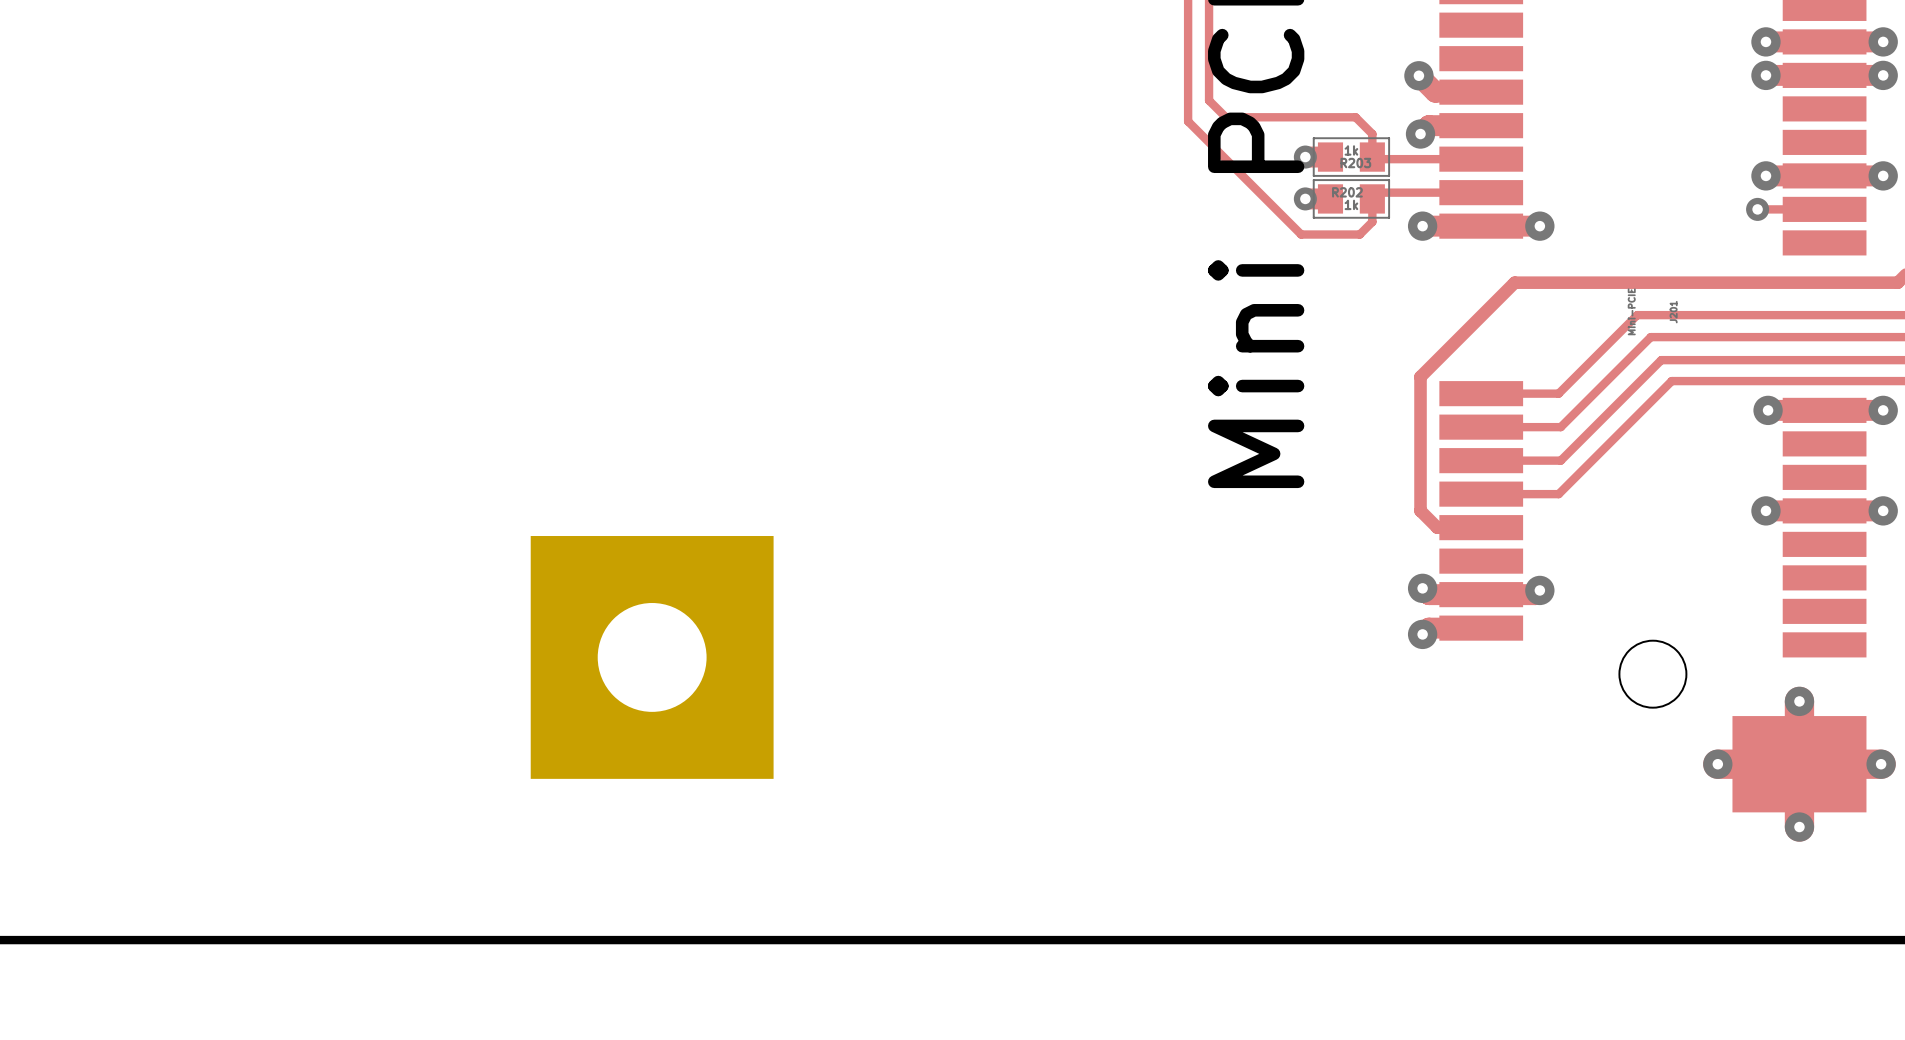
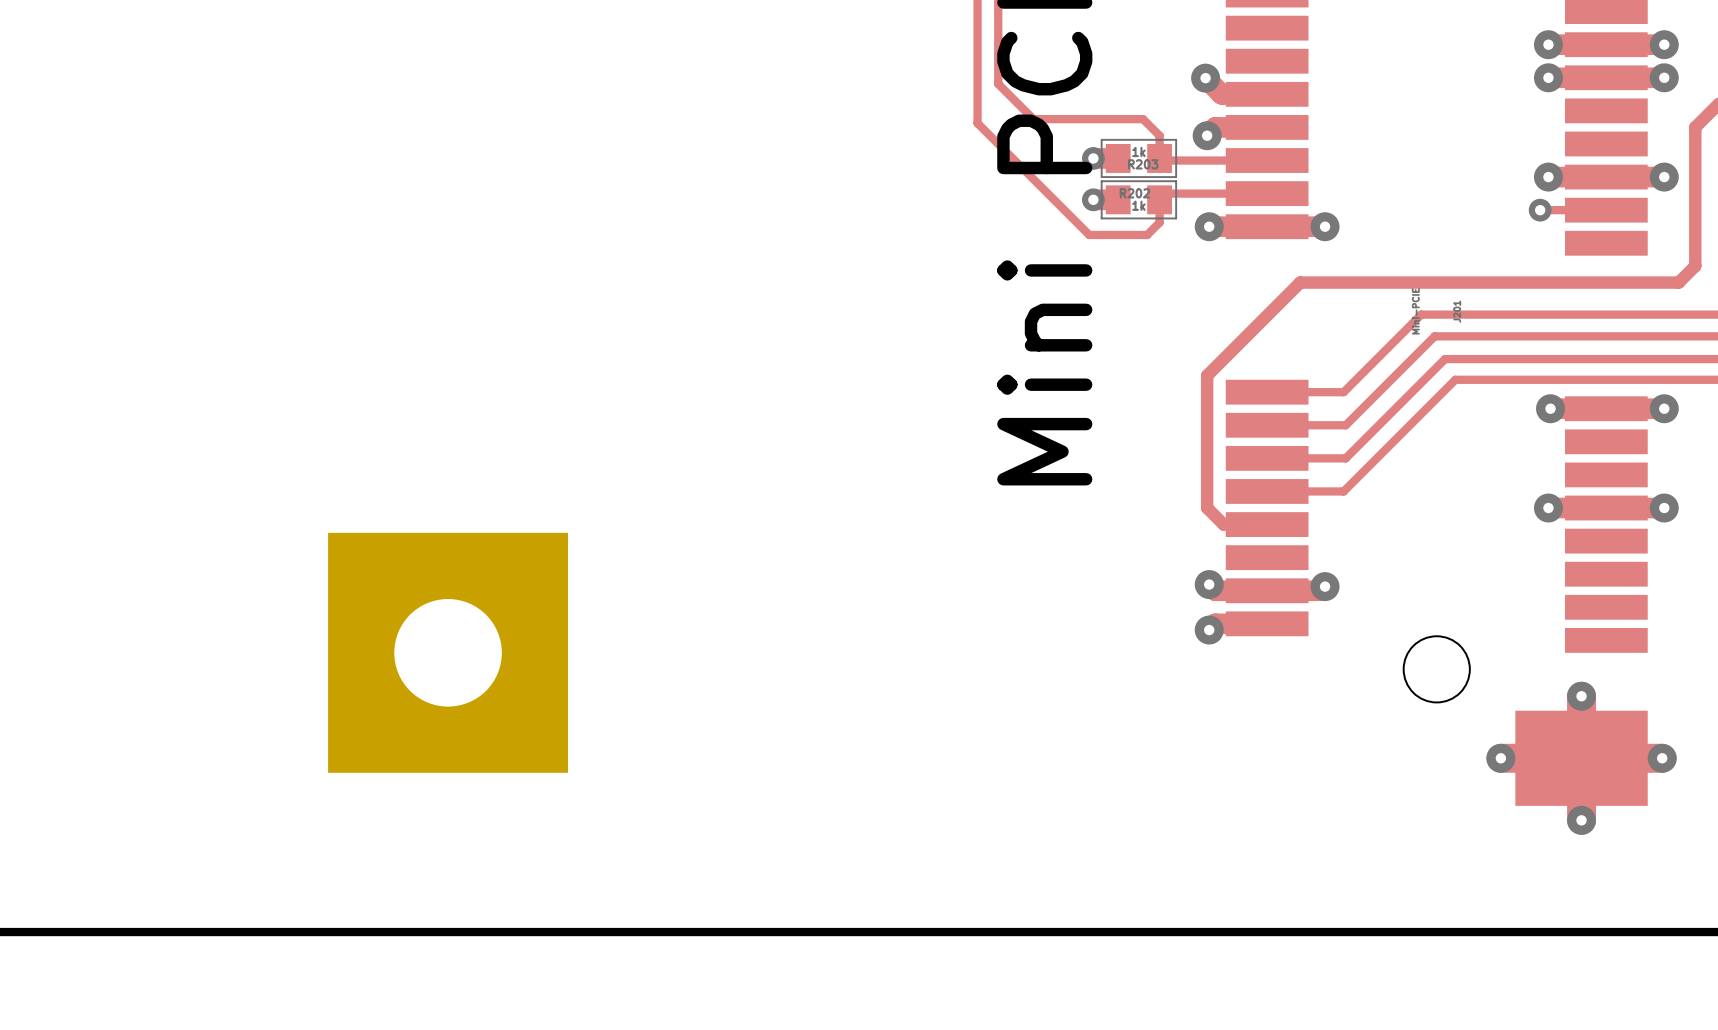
track: (1209, 81) (1209, 100) (1225, 117) (1244, 117) -> (998, 83) (1033, 119)

